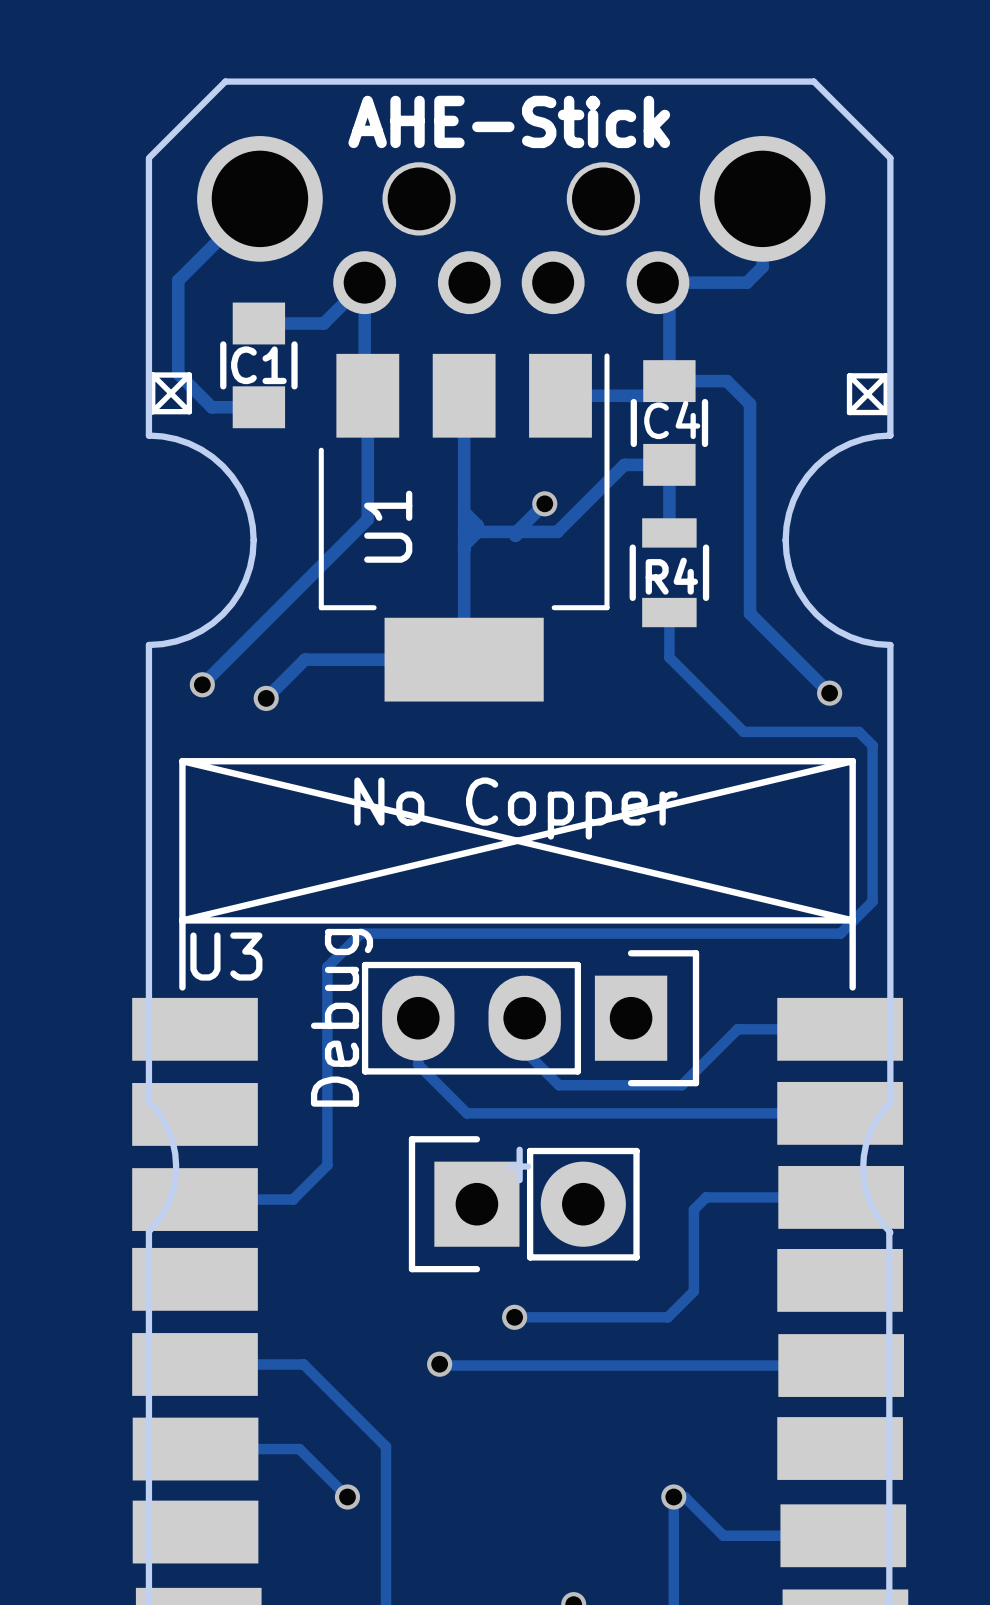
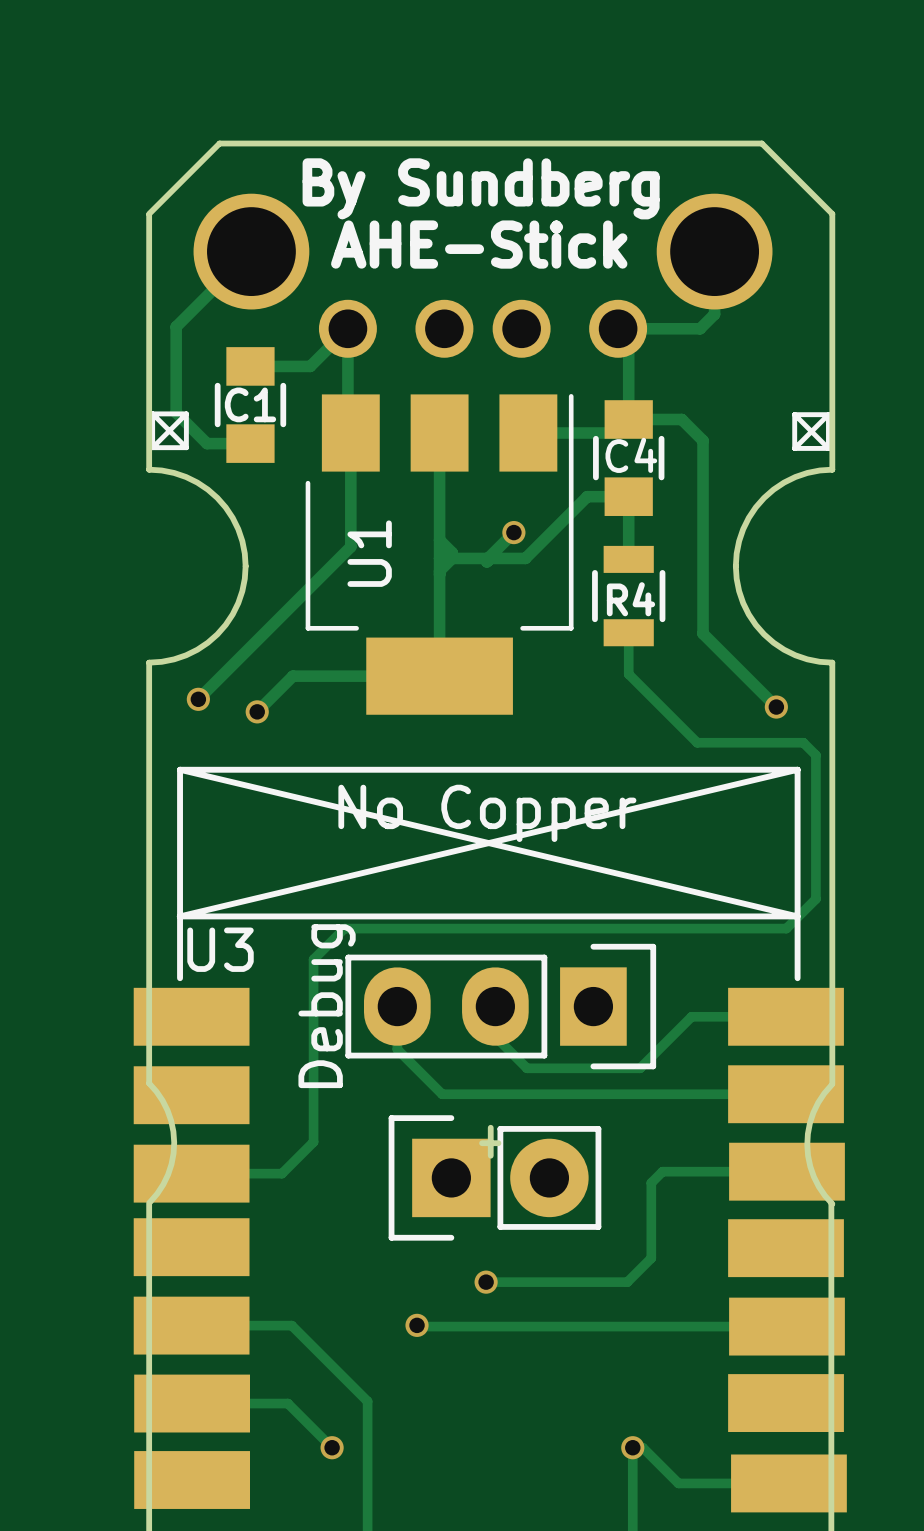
text: AHE-Stick (509, 121) -> By Sundberg (481, 188)
part footprint: [197, 136, 826, 315] -> [193, 193, 773, 358]
text: none -> AHE-Stick (479, 244)

